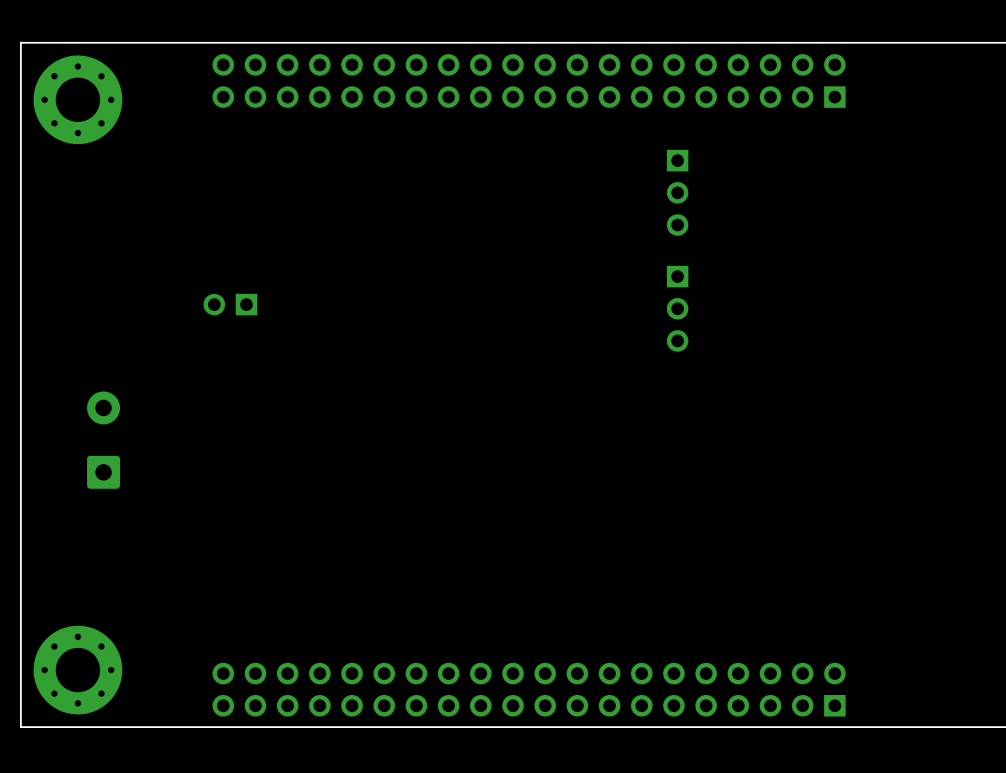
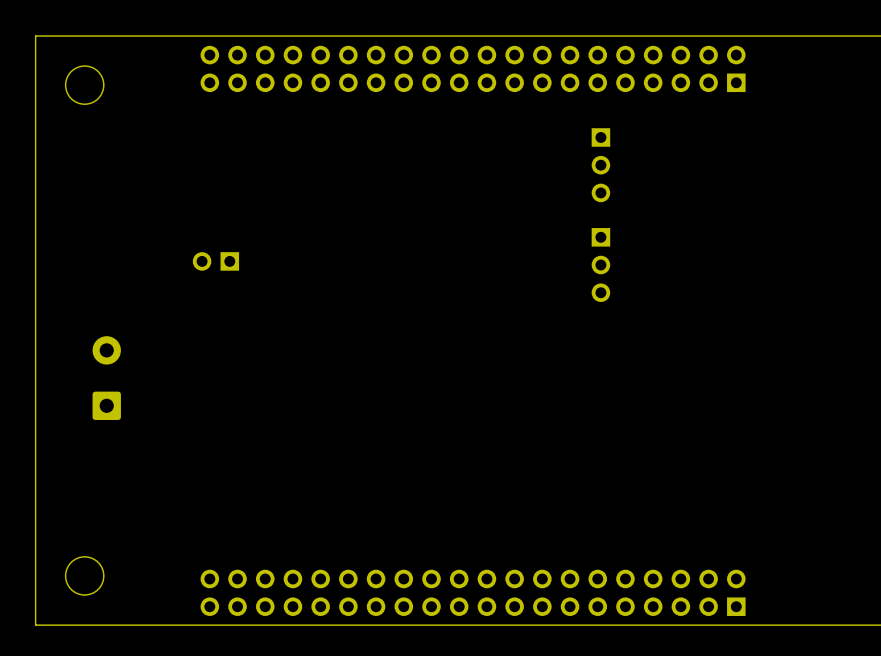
round board edge: none -> [65, 65, 105, 105]
part: (77, 99) -> none
round board edge: none -> [65, 556, 105, 596]
part: (77, 670) -> none

